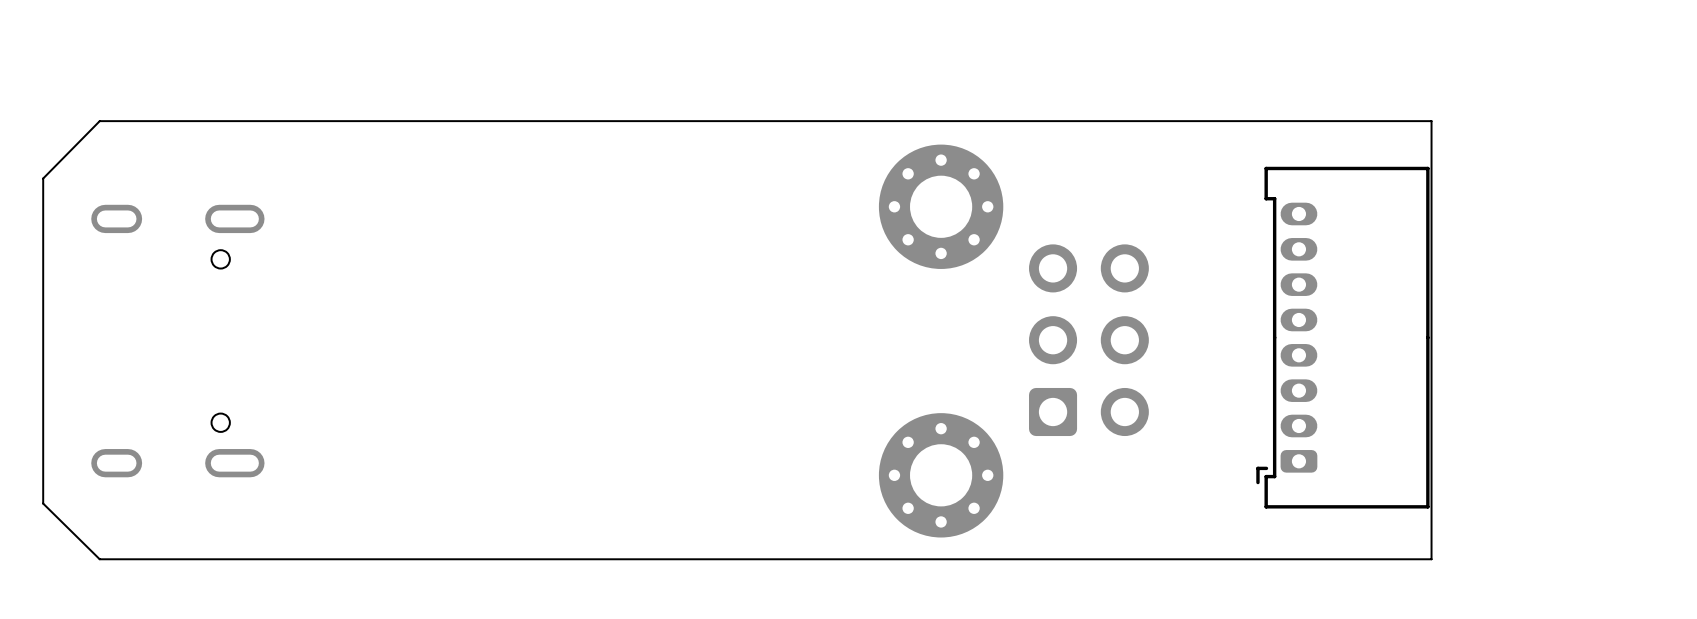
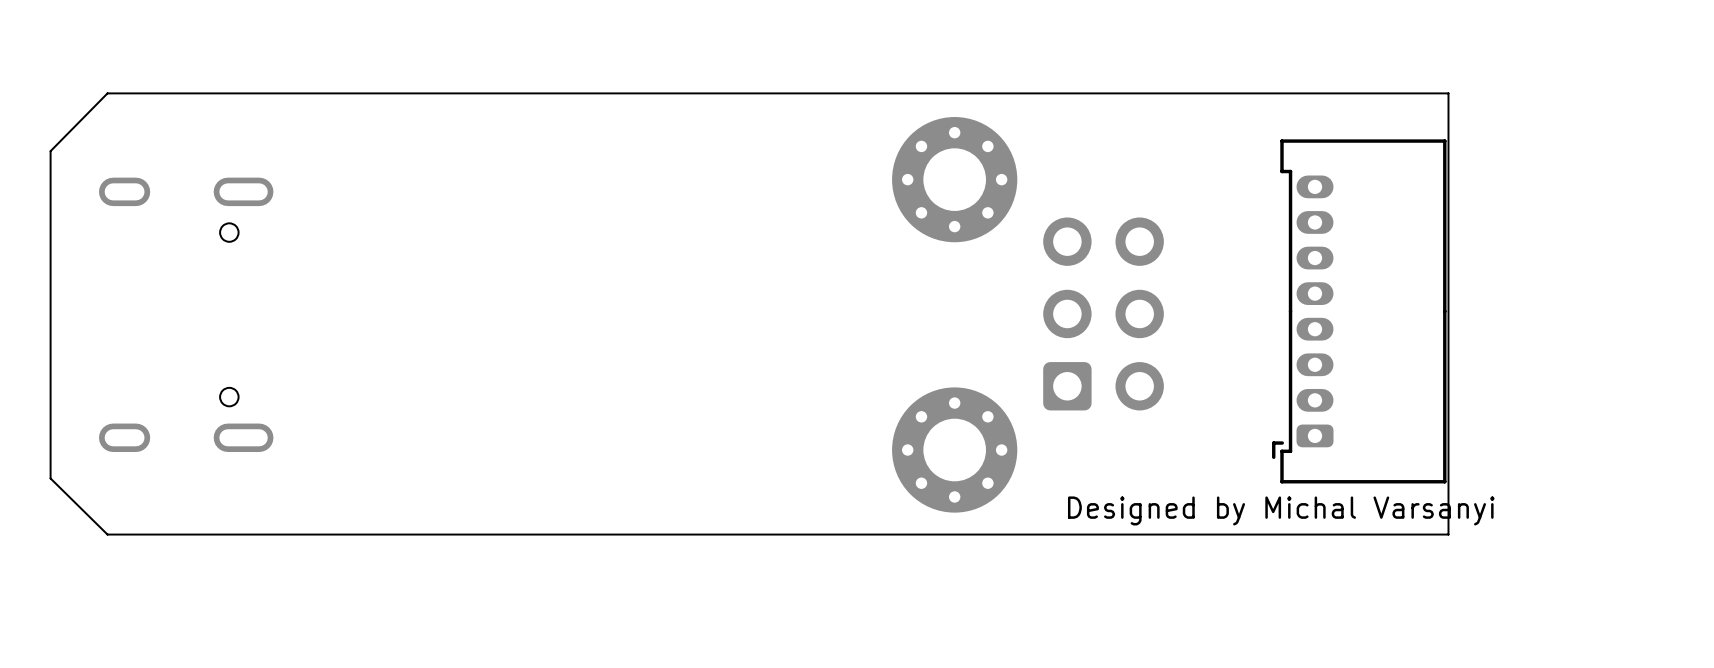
text: none -> Designed by Michal Varsanyi (1281, 510)

